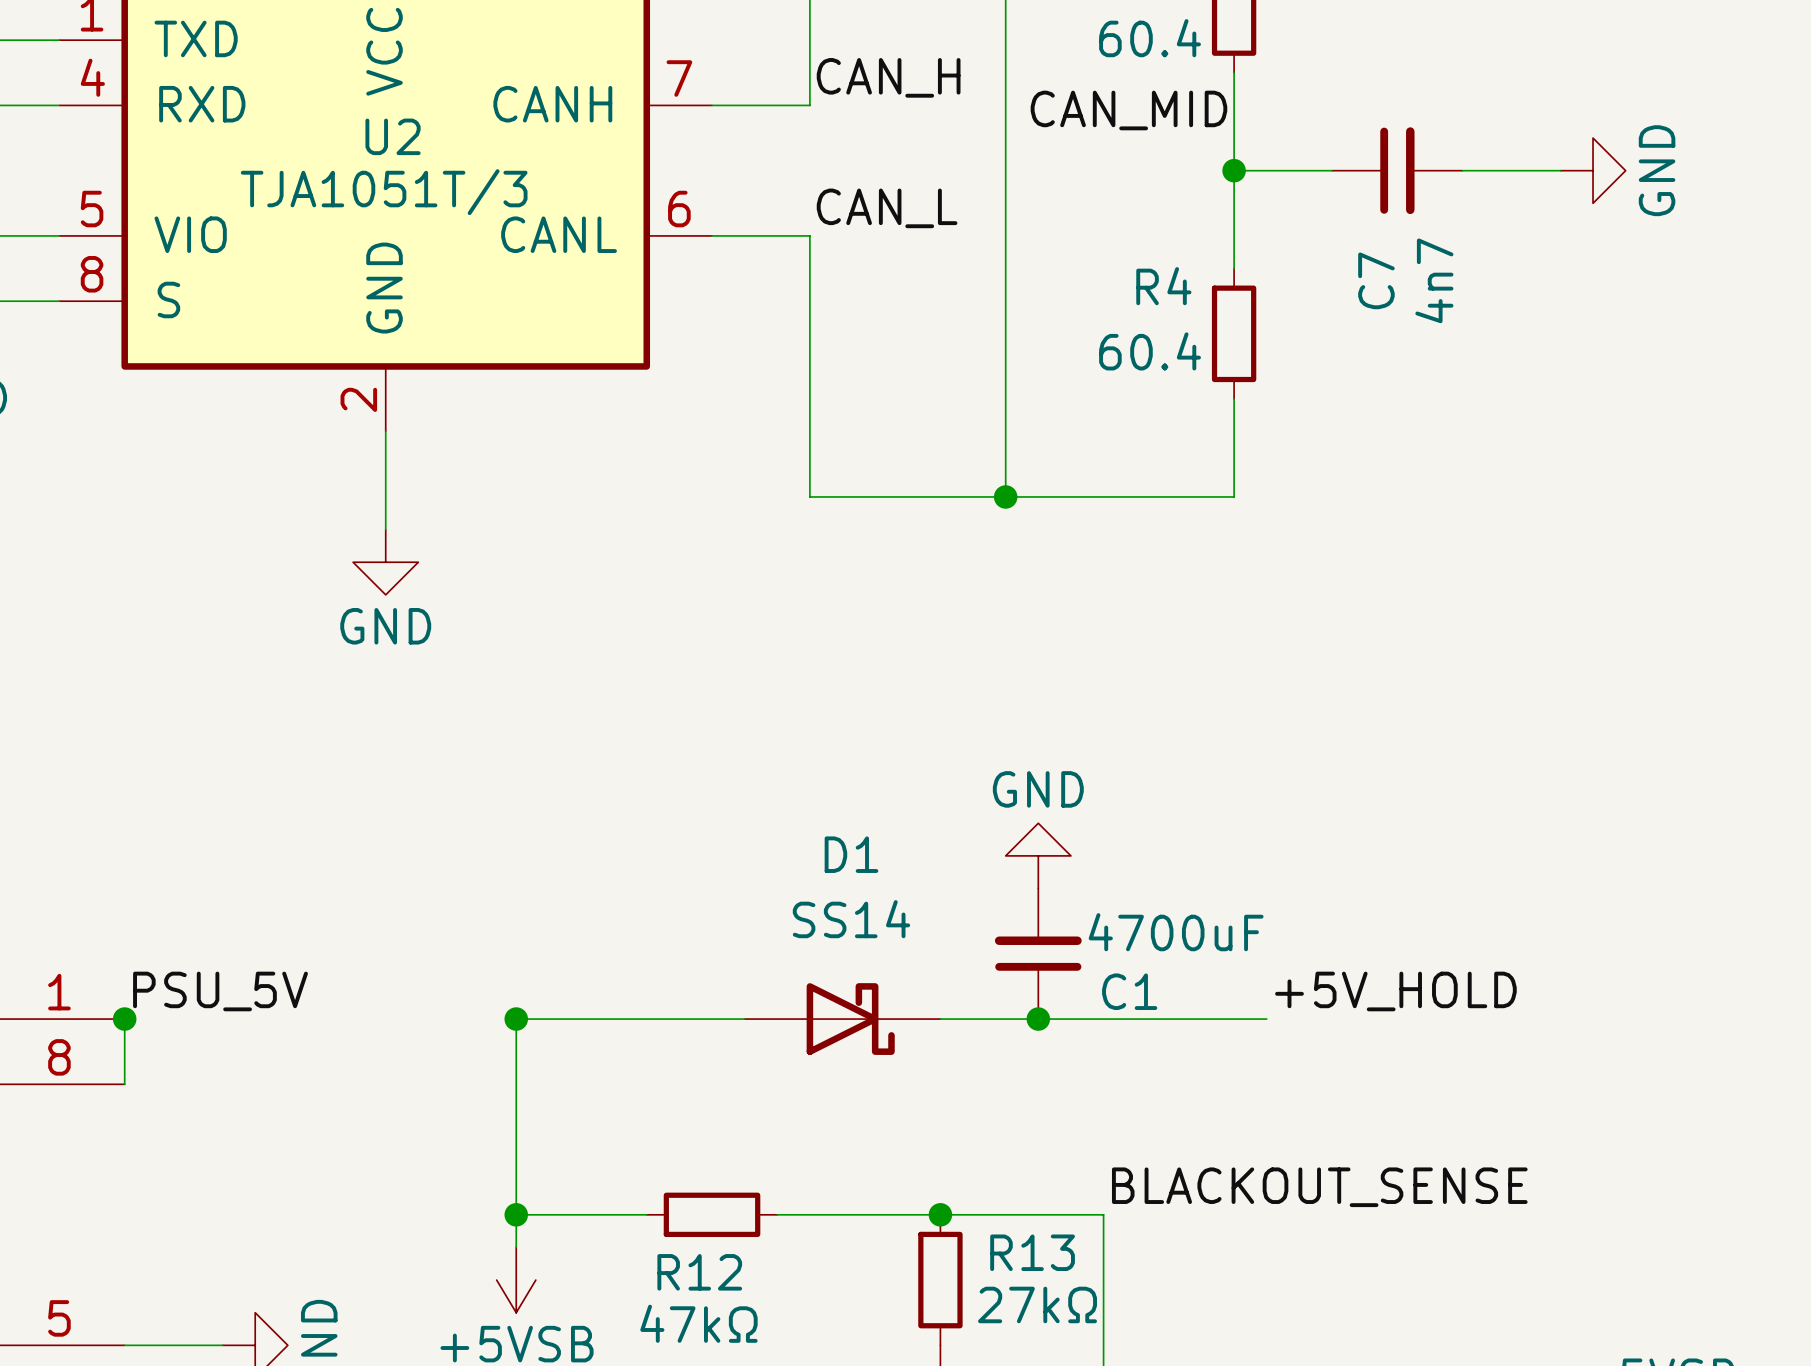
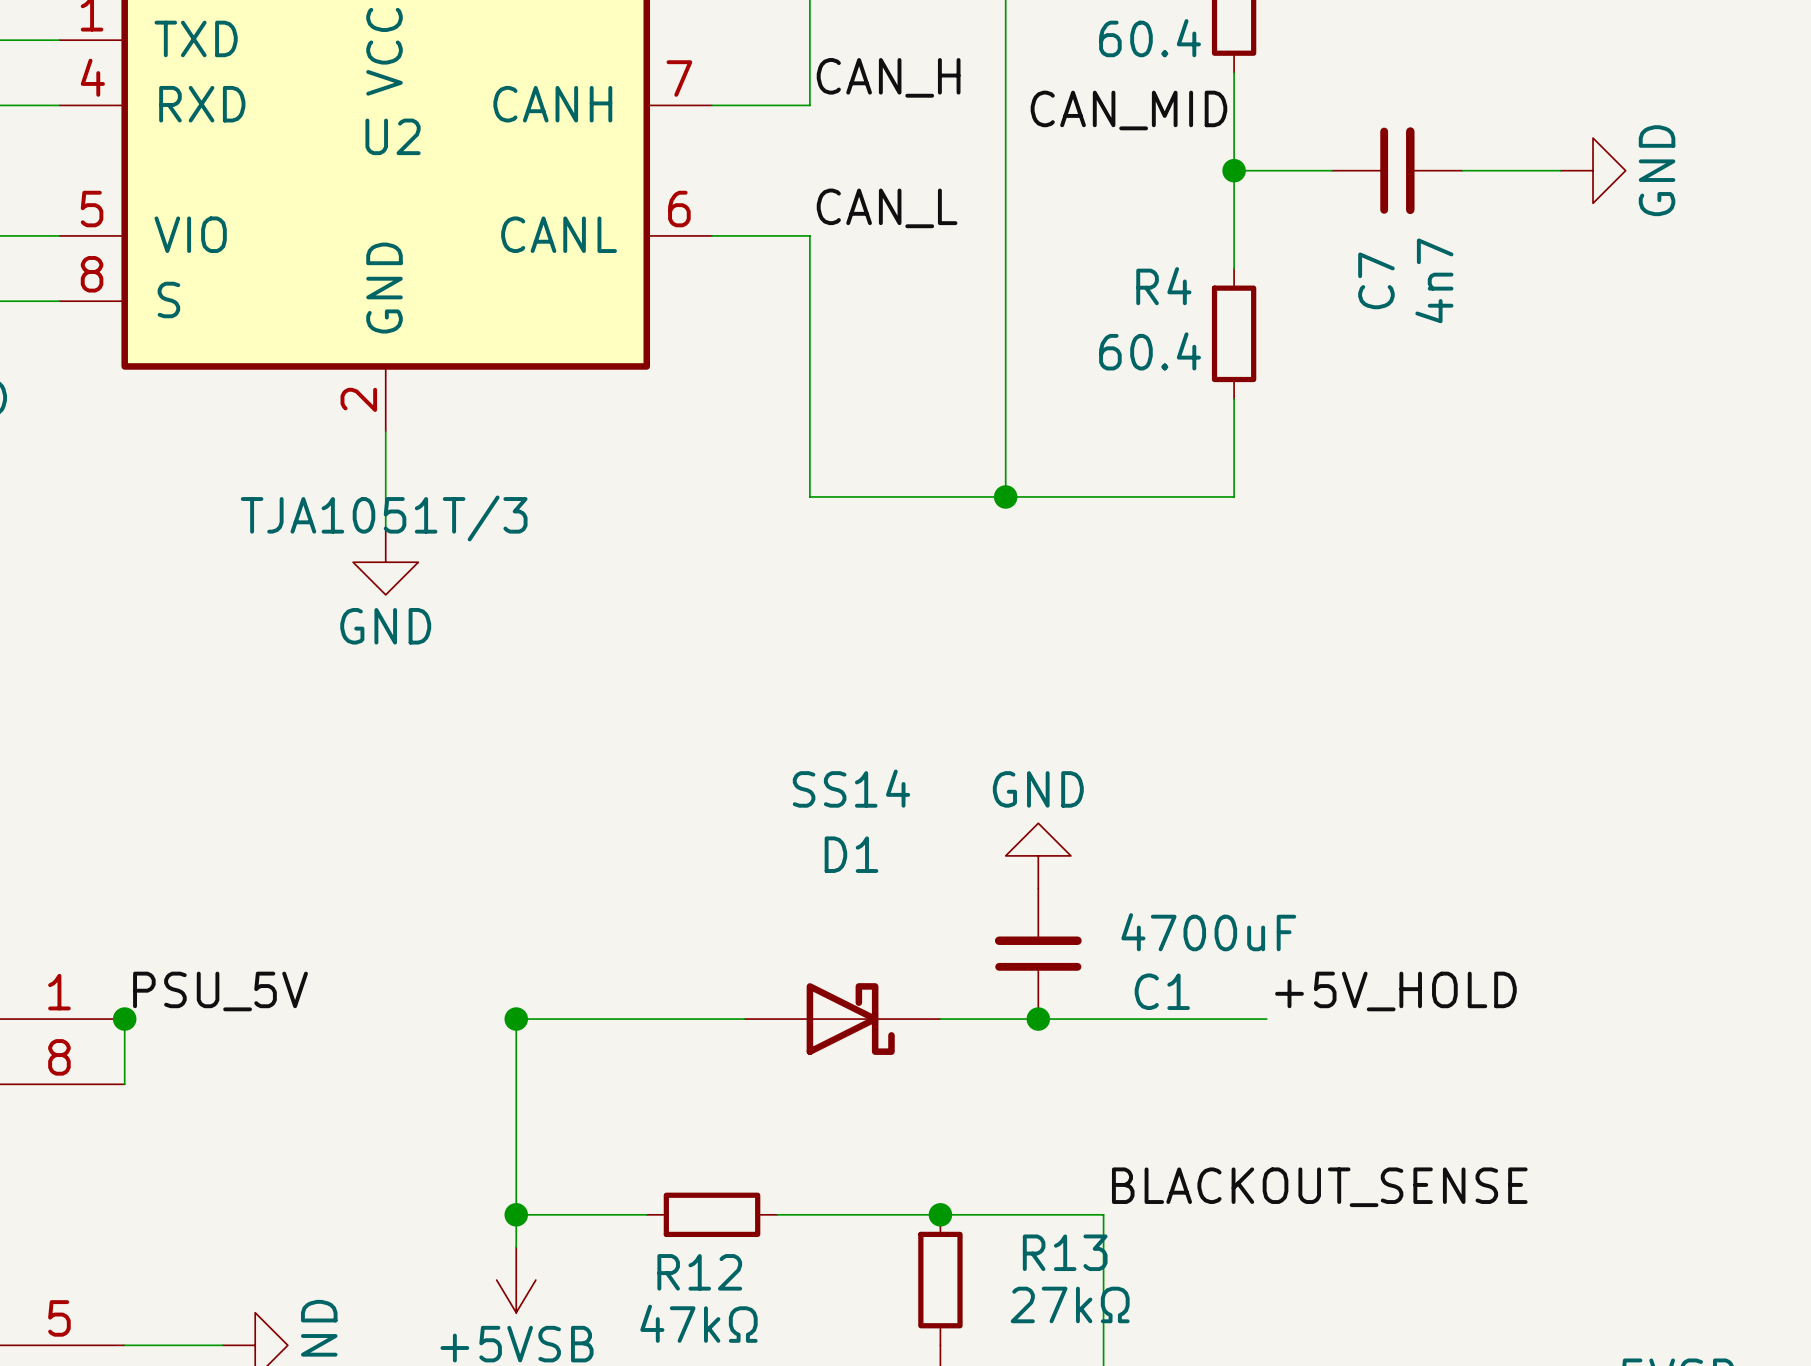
U2 value position: TJA1051T/3 (384, 192) -> TJA1051T/3 (384, 518)
D1 value position: SS14 (851, 919) -> SS14 (851, 788)
C1 value position: 4700uF (1176, 932) -> 4700uF (1208, 932)
C1 name position: C1 (1129, 991) -> C1 (1162, 991)
R13 name position: R13 (1032, 1252) -> R13 (1065, 1252)
R13 value position: 27kΩ (1037, 1304) -> 27kΩ (1070, 1304)

